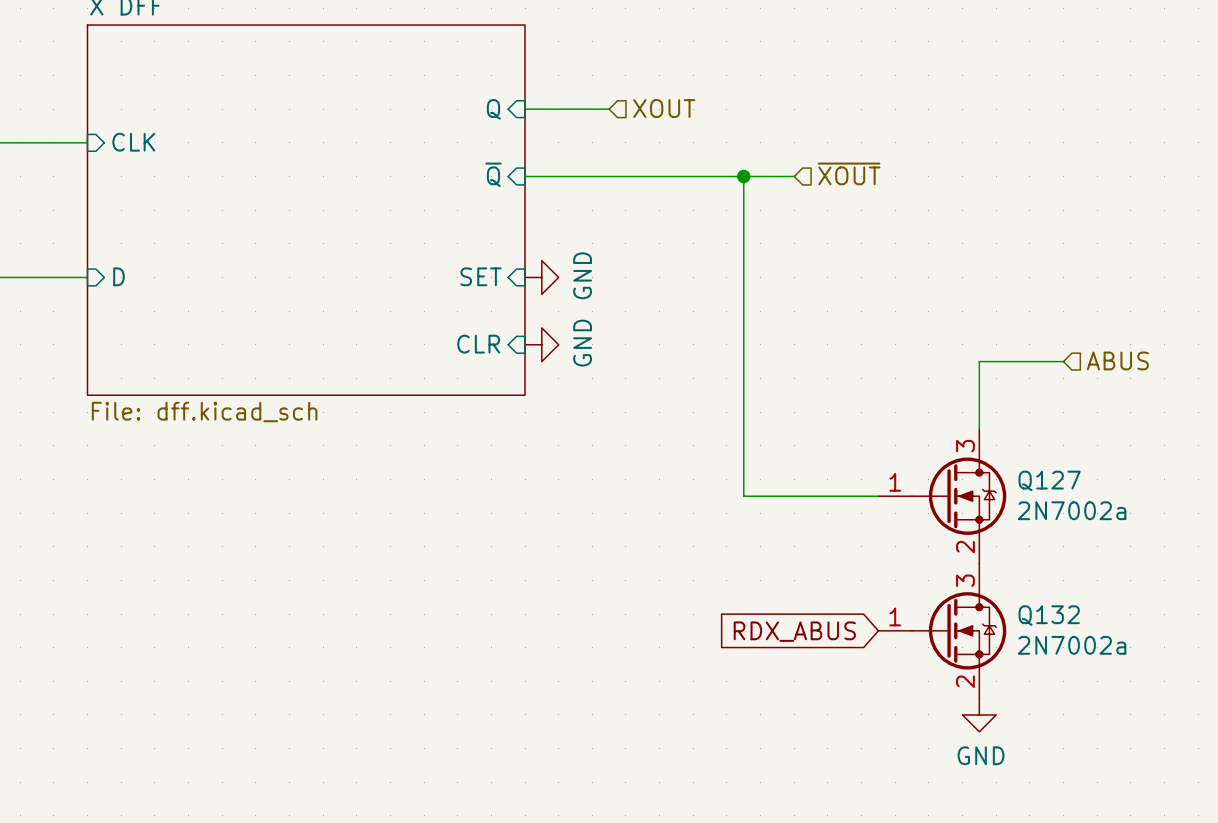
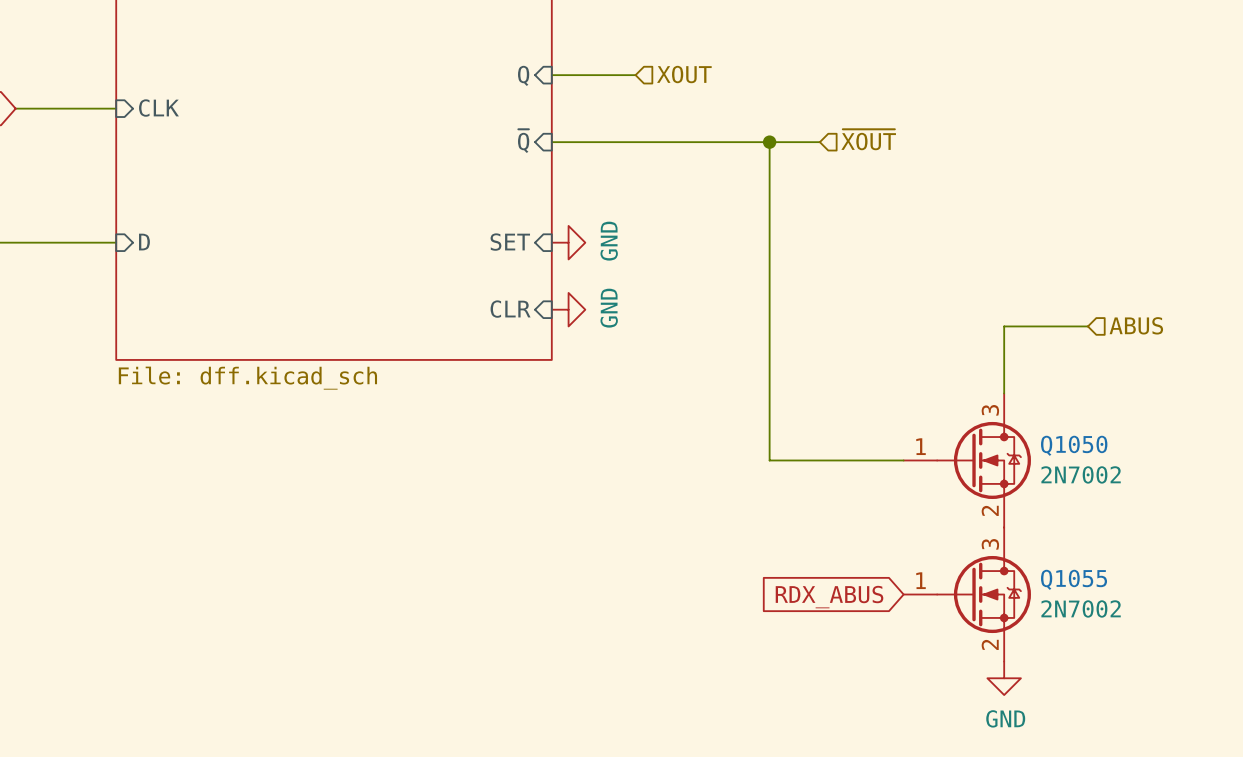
Q127 name: Q127 (1049, 480) -> Q1050 (1074, 445)
Q127 value: 2N7002a (1072, 510) -> 2N7002 (1081, 474)
Q132 name: Q132 (1049, 615) -> Q1055 (1074, 579)
Q132 value: 2N7002a (1072, 645) -> 2N7002 (1081, 608)

